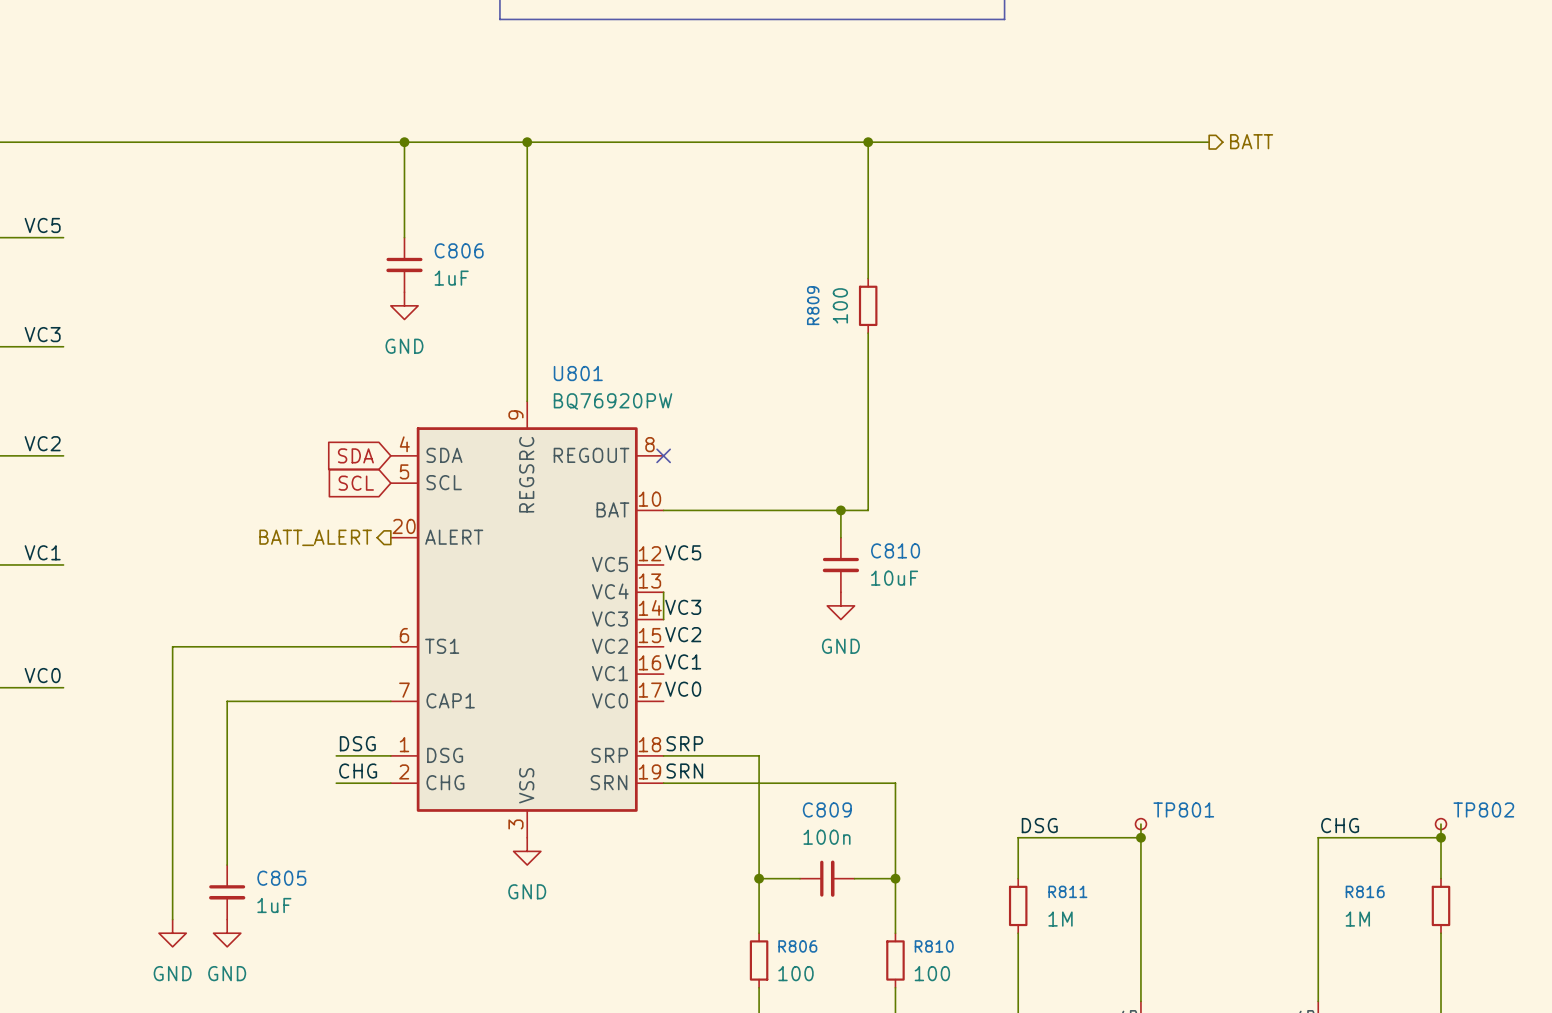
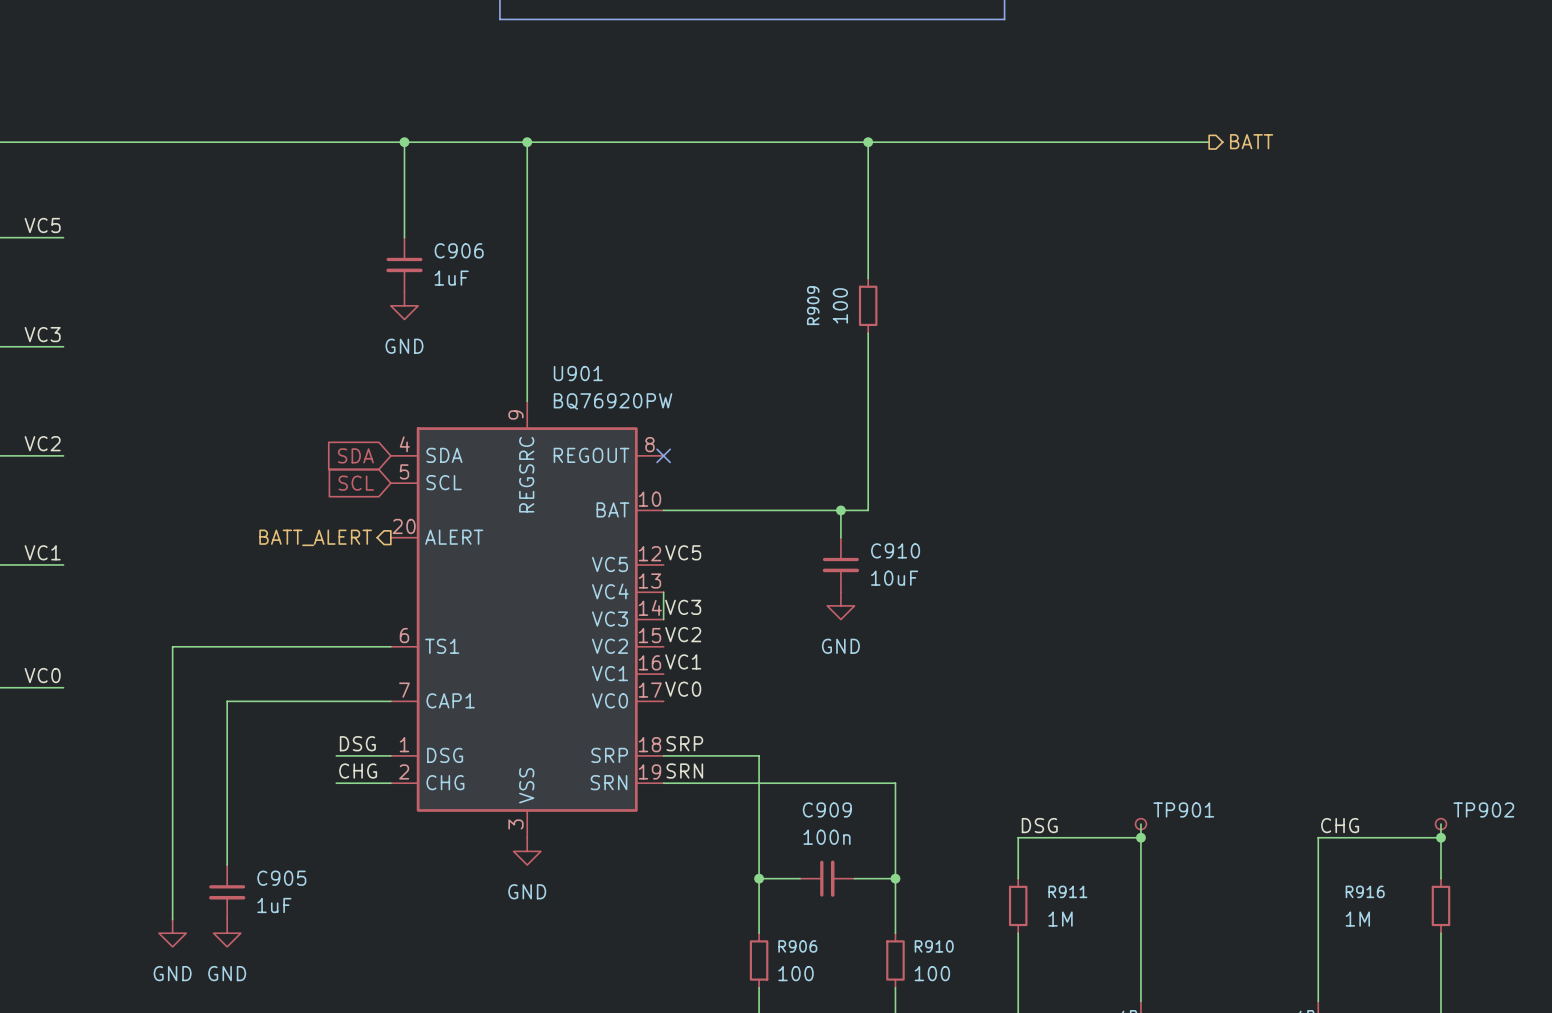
C806 name: C806 (459, 250) -> C906 (459, 250)
R809 name: R809 (813, 305) -> R909 (813, 305)
U801 name: U801 (578, 373) -> U901 (578, 373)
C810 name: C810 (895, 550) -> C910 (895, 550)
C809 name: C809 (827, 809) -> C909 (827, 809)
TP801 name: TP801 (1183, 809) -> TP901 (1183, 809)
TP802 name: TP802 (1483, 809) -> TP902 (1483, 809)
C805 name: C805 (281, 878) -> C905 (281, 878)
R811 name: R811 (1067, 891) -> R911 (1067, 891)
R816 name: R816 (1365, 891) -> R916 (1365, 891)
R806 name: R806 (797, 946) -> R906 (797, 946)
R810 name: R810 (934, 946) -> R910 (934, 946)

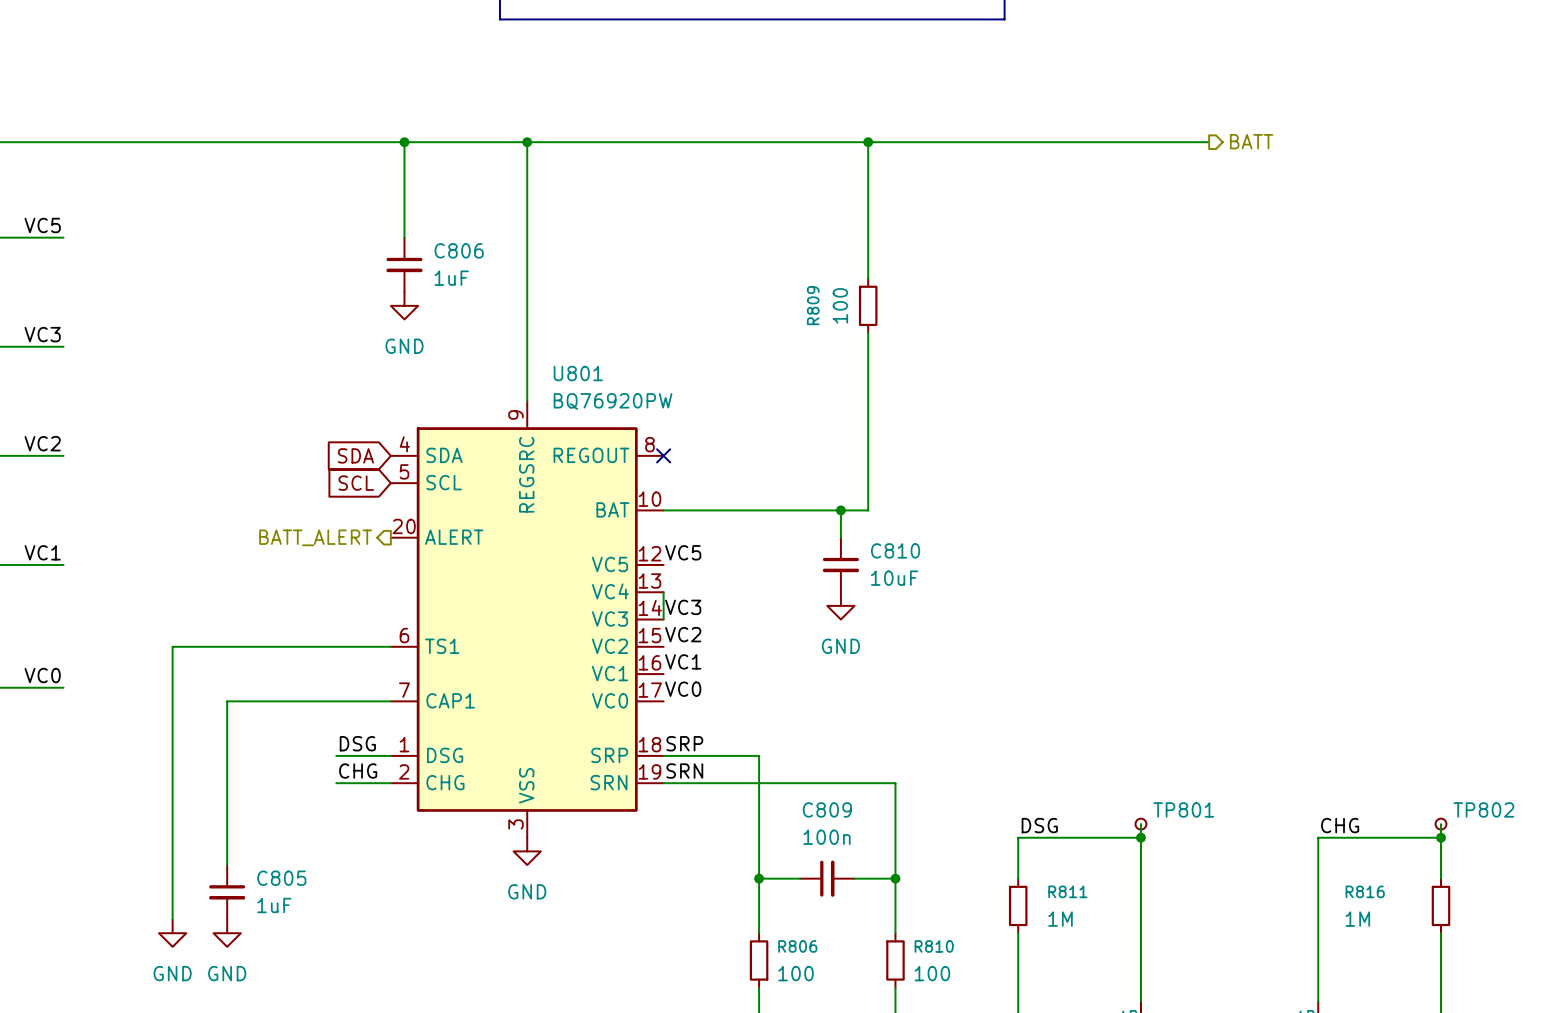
C906 name: C906 (459, 250) -> C806 (459, 250)
R909 name: R909 (813, 305) -> R809 (813, 305)
U901 name: U901 (578, 373) -> U801 (578, 373)
C910 name: C910 (895, 550) -> C810 (895, 550)
C909 name: C909 (827, 809) -> C809 (827, 809)
TP901 name: TP901 (1183, 809) -> TP801 (1183, 809)
TP902 name: TP902 (1483, 809) -> TP802 (1483, 809)
C905 name: C905 (281, 878) -> C805 (281, 878)
R911 name: R911 (1067, 891) -> R811 (1067, 891)
R916 name: R916 (1365, 891) -> R816 (1365, 891)
R906 name: R906 (797, 946) -> R806 (797, 946)
R910 name: R910 (934, 946) -> R810 (934, 946)

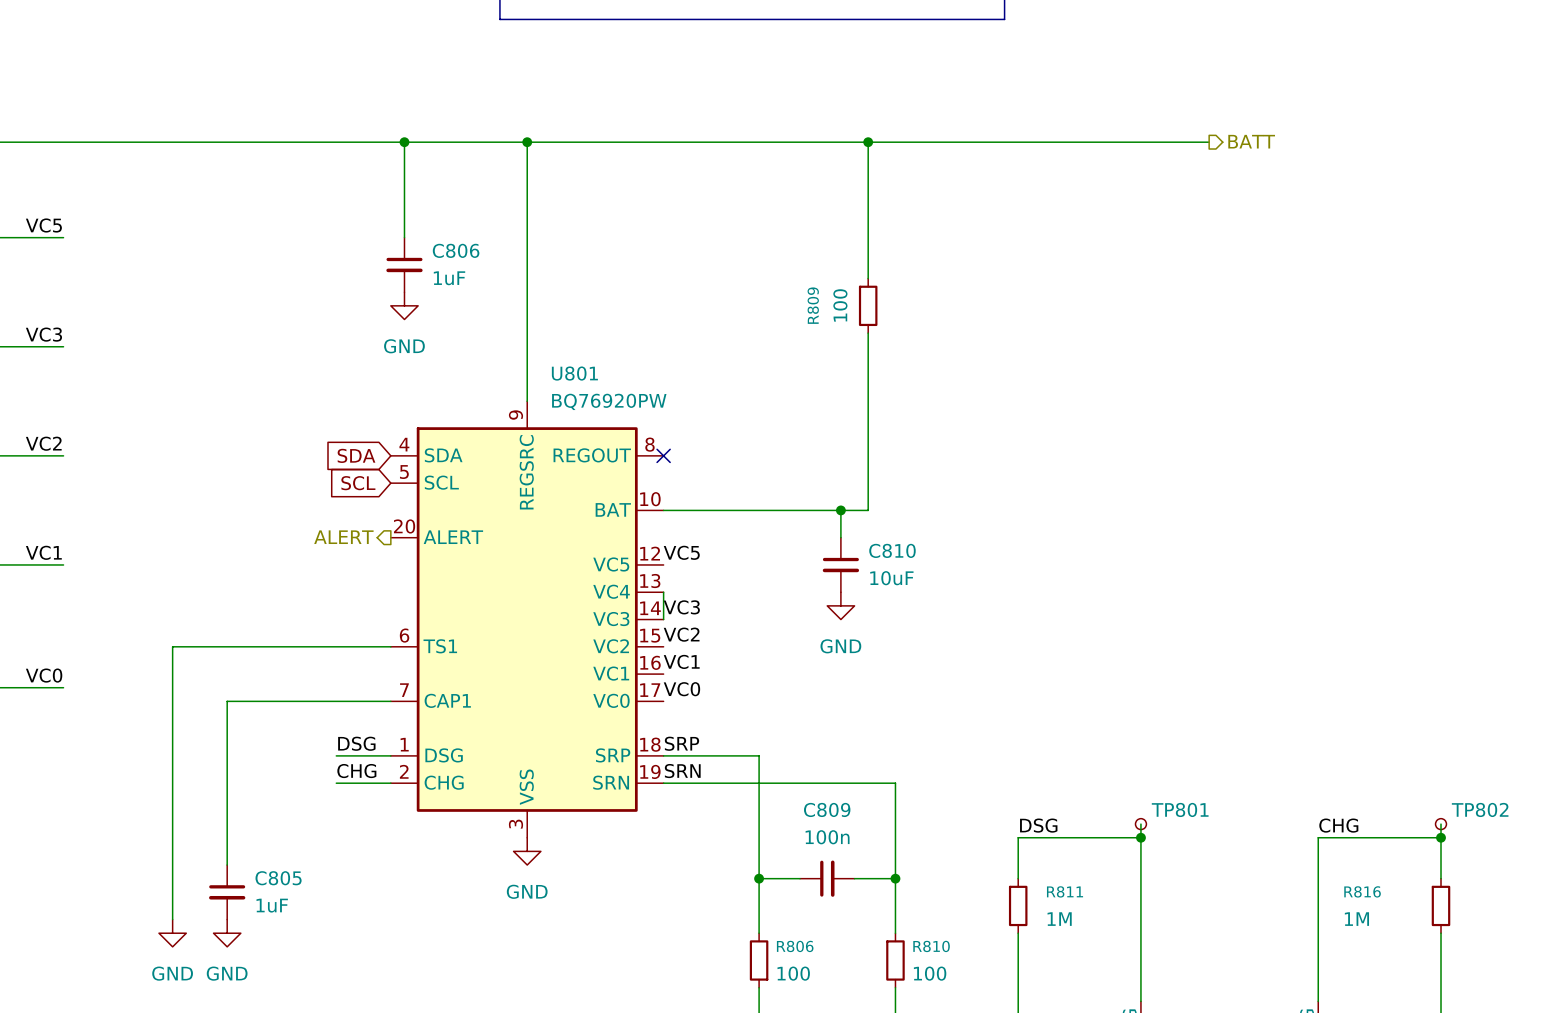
hierarchical label: BATT_ALERT (315, 537) -> ALERT (343, 537)

